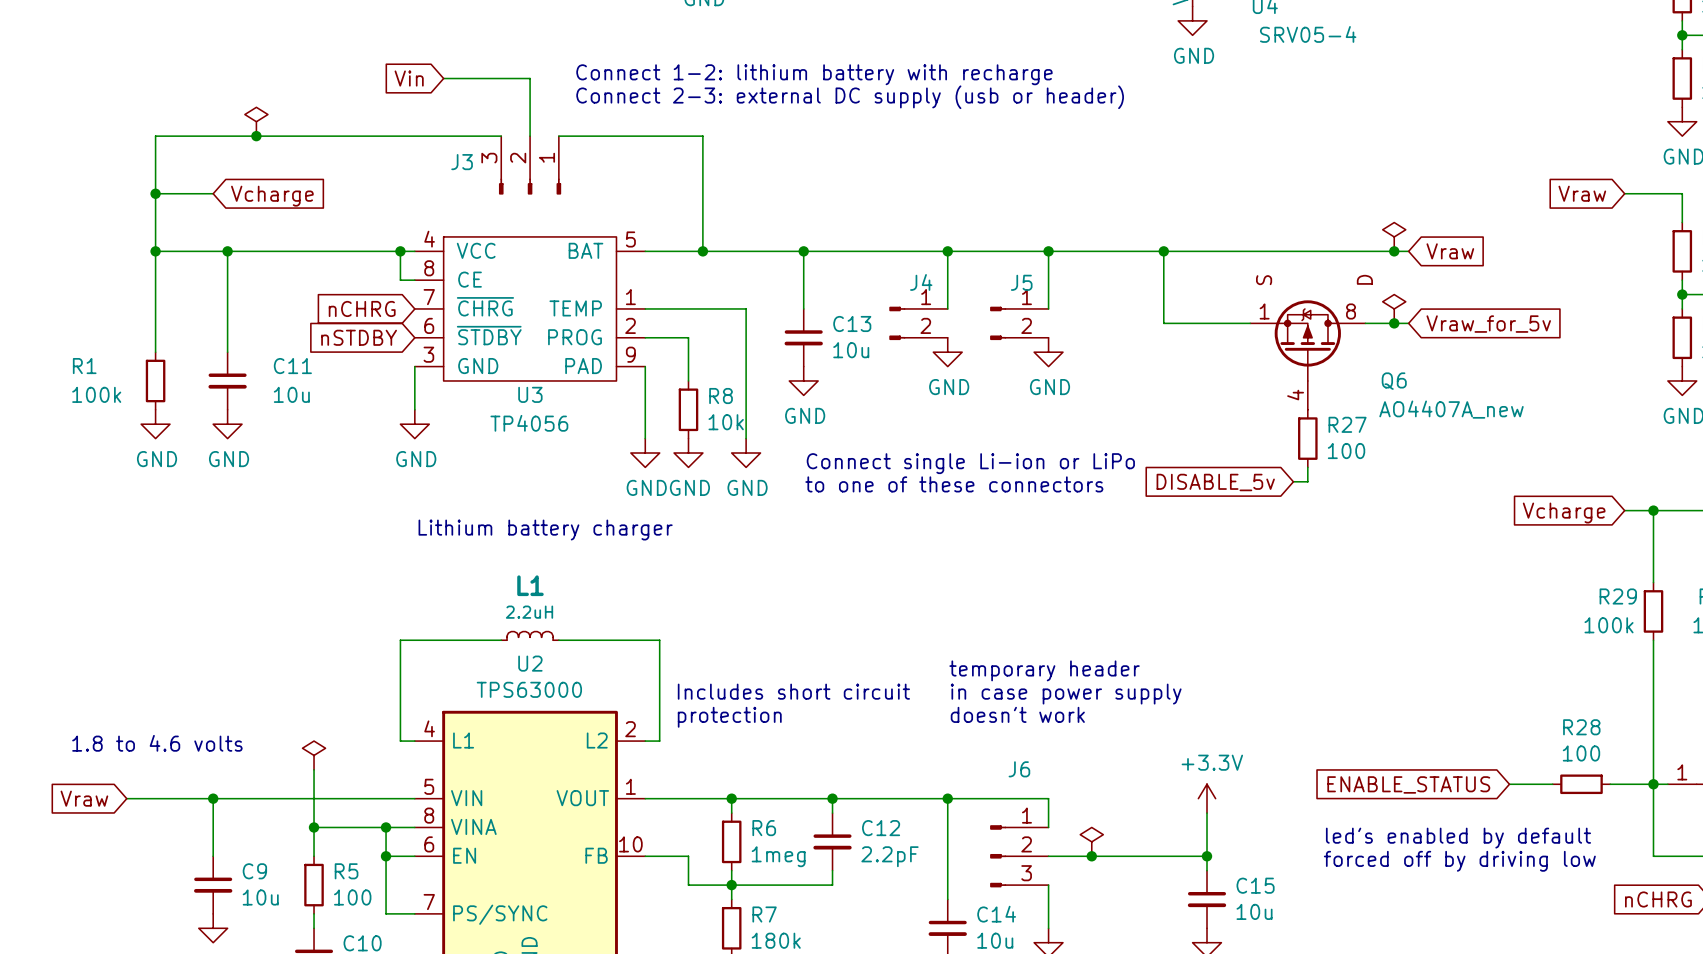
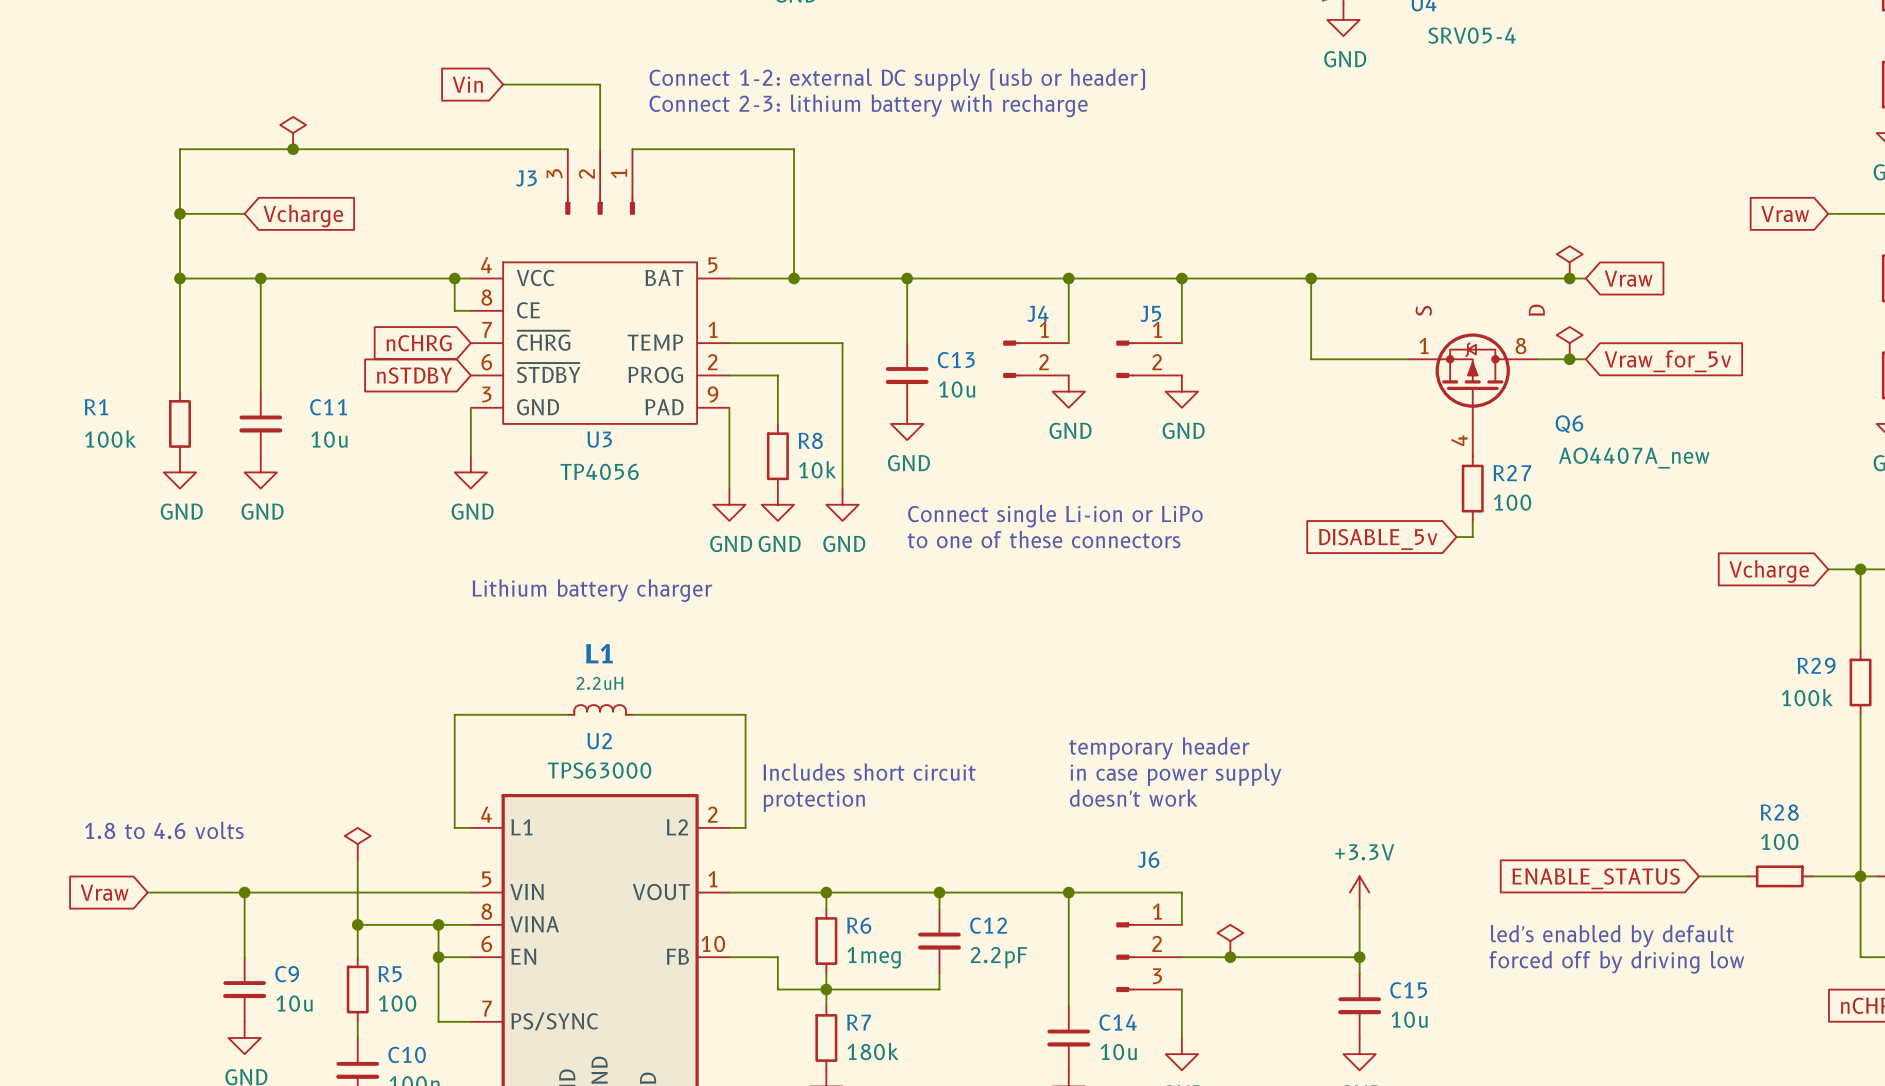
text: Connect 1-2: lithium battery with recharge (814, 74) -> Connect 1-2: external DC supply (usb or header) (897, 79)
text: Connect 2-3: external DC supply (usb or header) (850, 97) -> Connect 2-3: lithium battery with recharge (868, 105)

